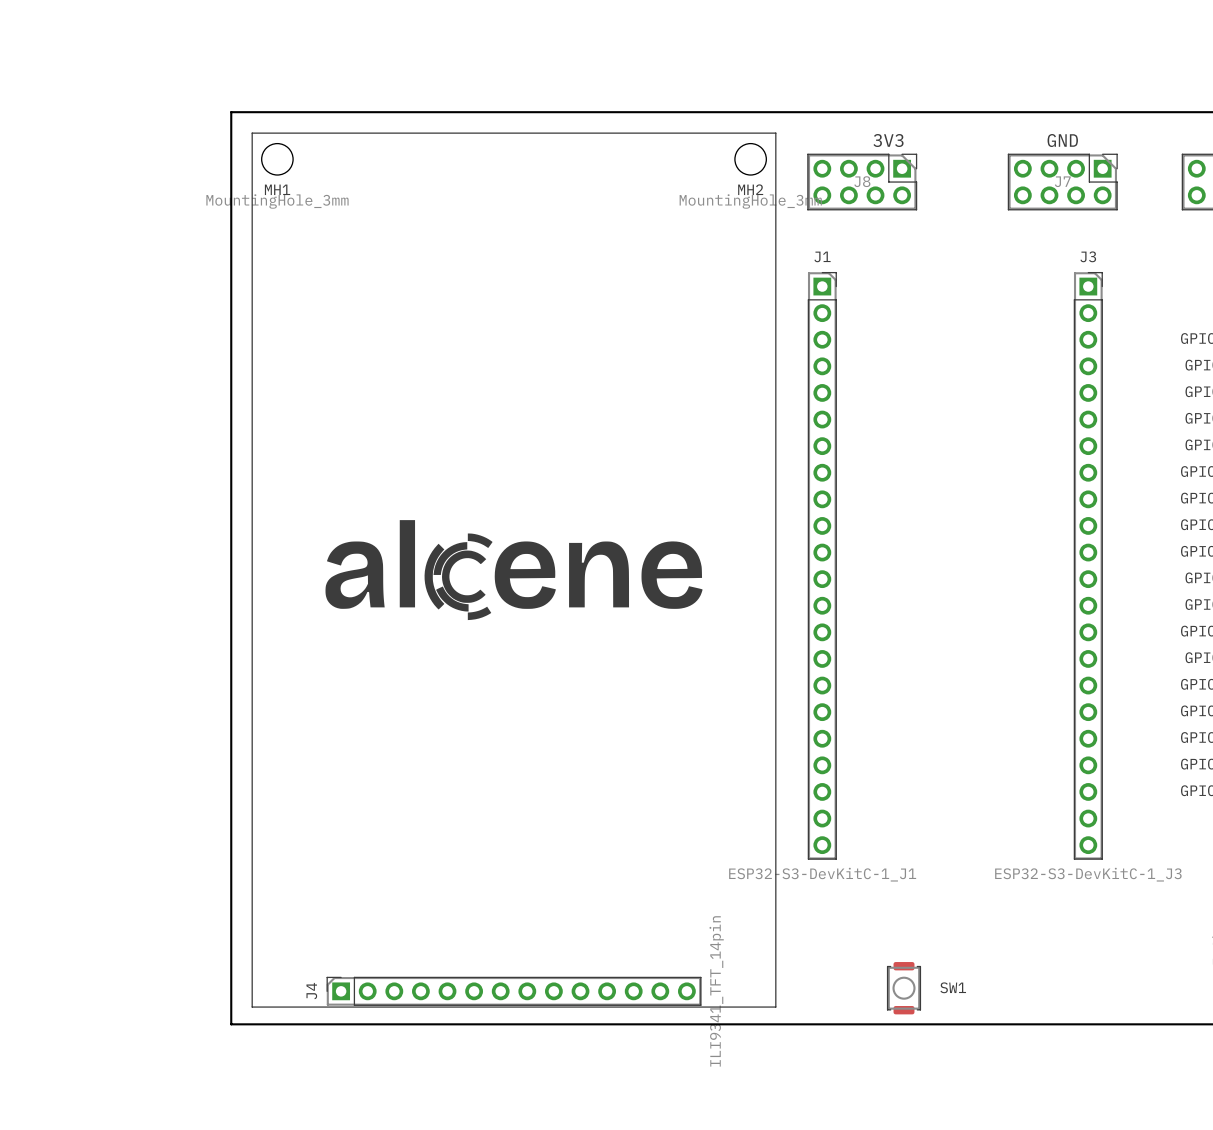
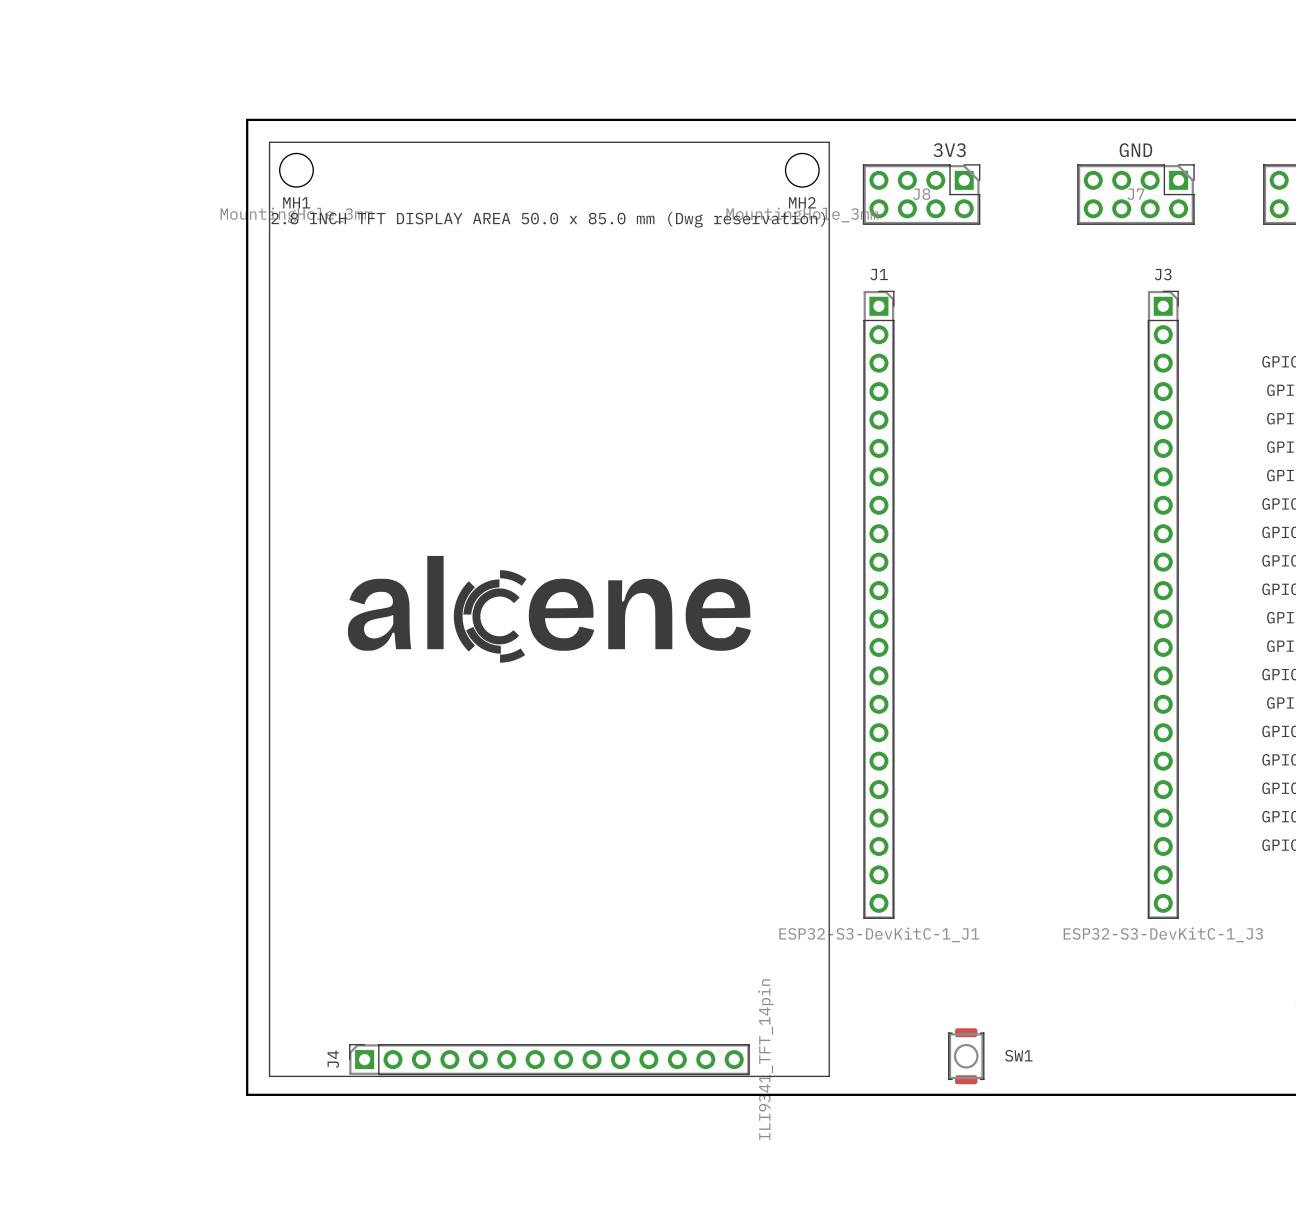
text: none -> 2.8 INCH TFT DISPLAY AREA 50.0 x 85.0 mm (Dwg reservation) (548, 219)

